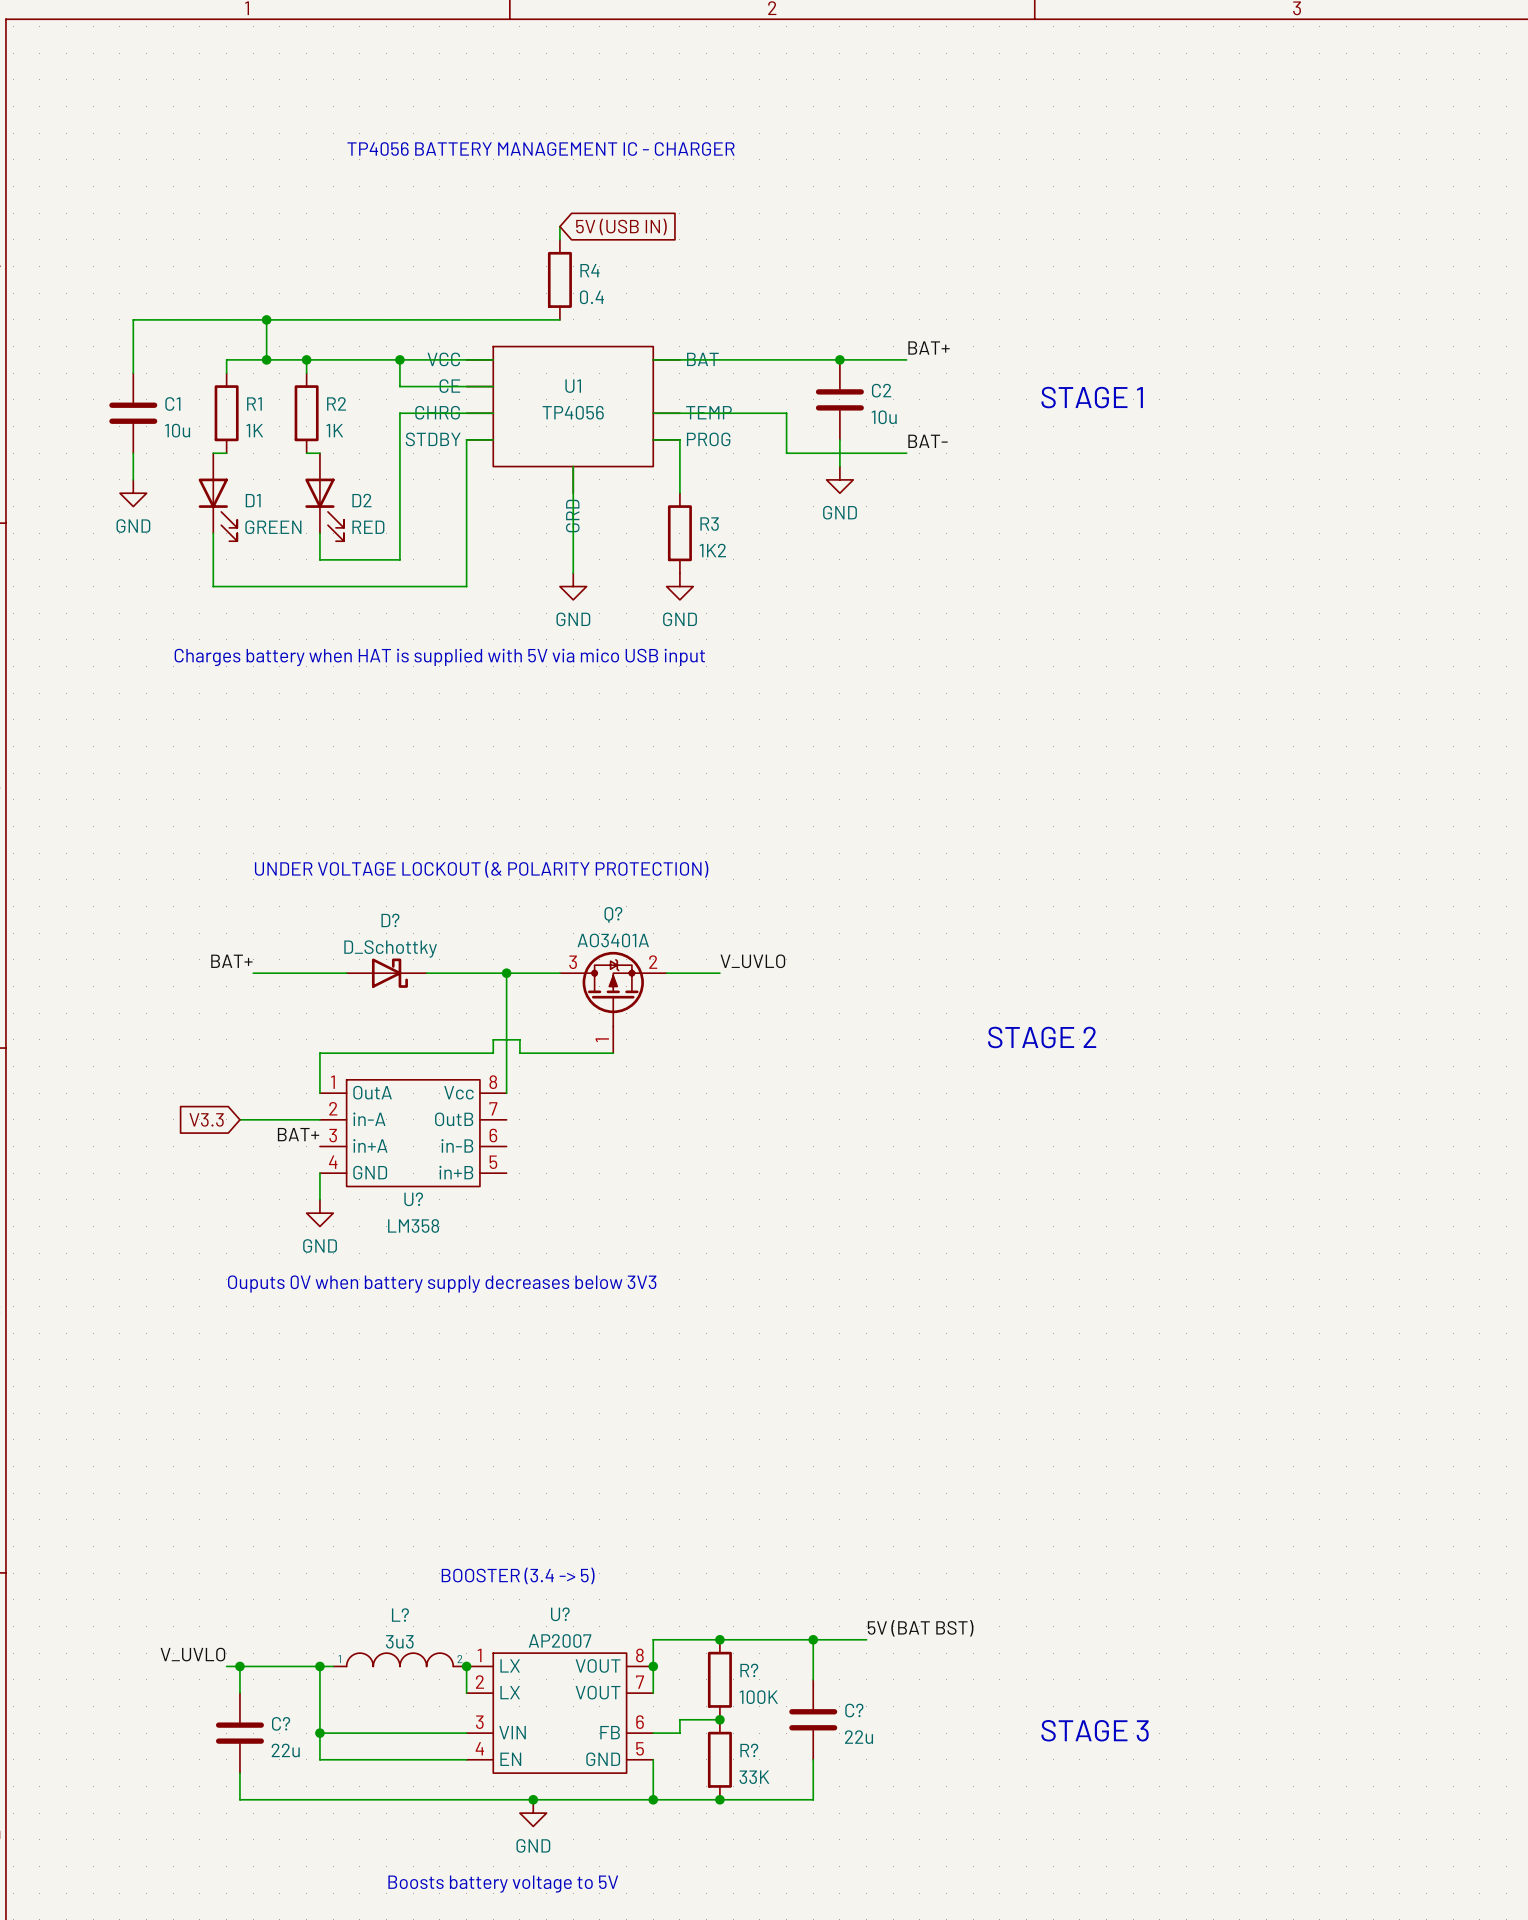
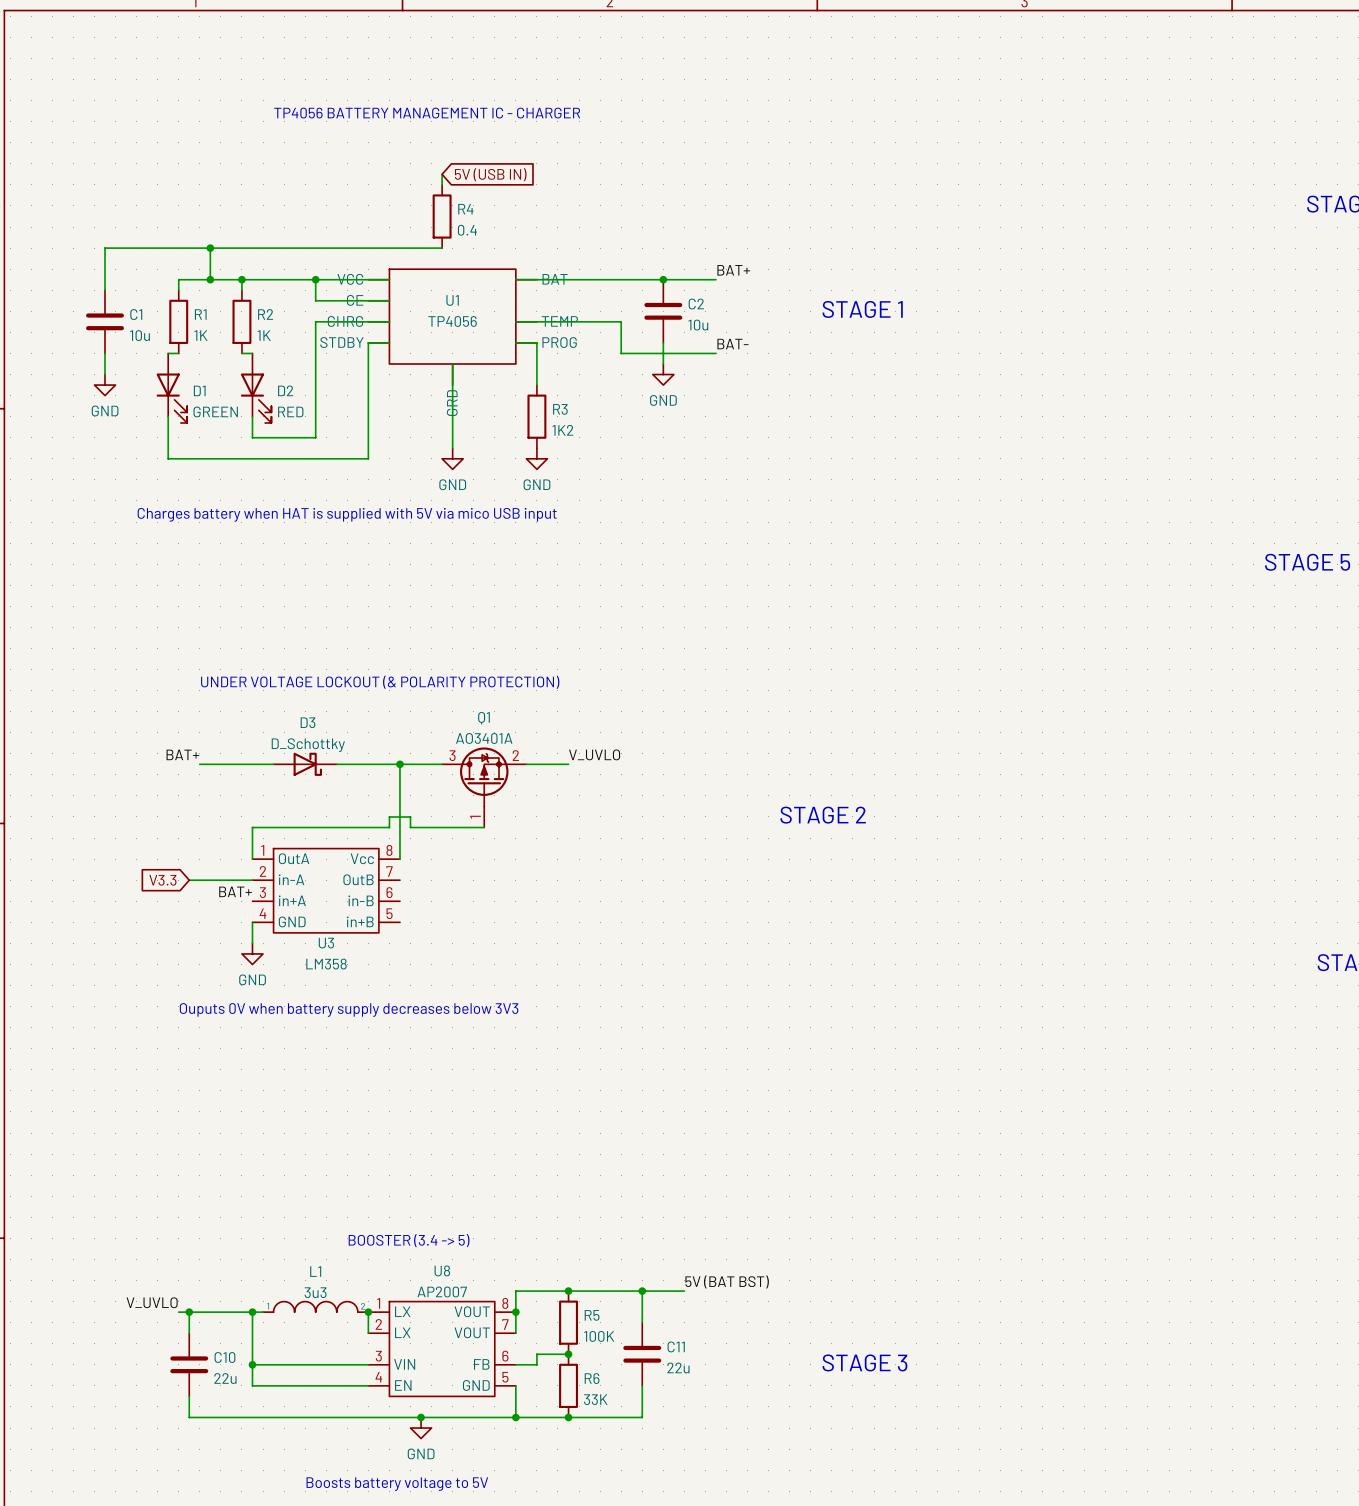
Q? name: Q? (613, 914) -> Q1 (483, 718)
D? name: D? (390, 920) -> D3 (308, 722)
U? name: U? (413, 1199) -> U3 (326, 943)
U? name: U? (560, 1614) -> U8 (442, 1270)
L? name: L? (400, 1615) -> L1 (315, 1271)
R? name: R? (749, 1670) -> R5 (592, 1315)
C? name: C? (854, 1710) -> C11 (676, 1346)
C? name: C? (281, 1723) -> C10 (224, 1357)
R? name: R? (749, 1750) -> R6 (592, 1378)

